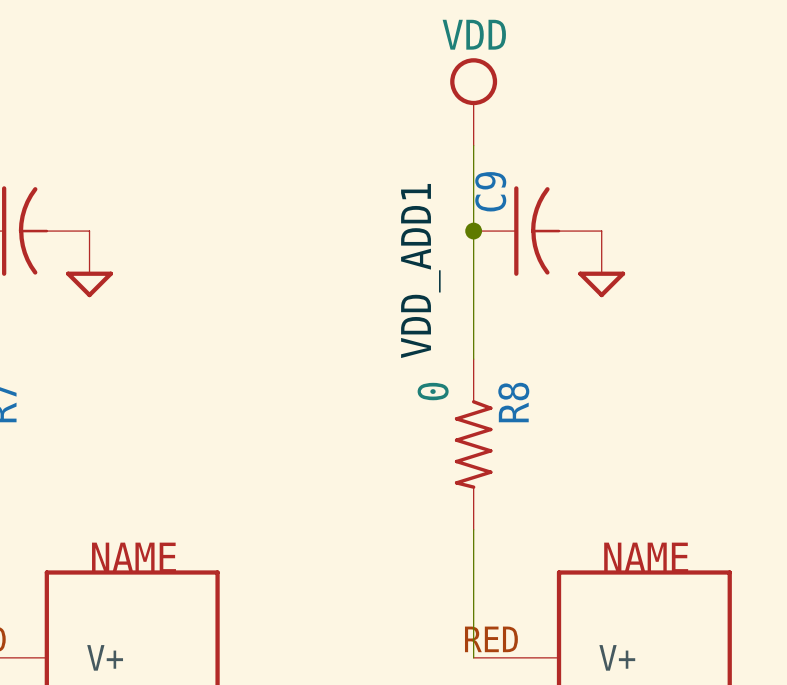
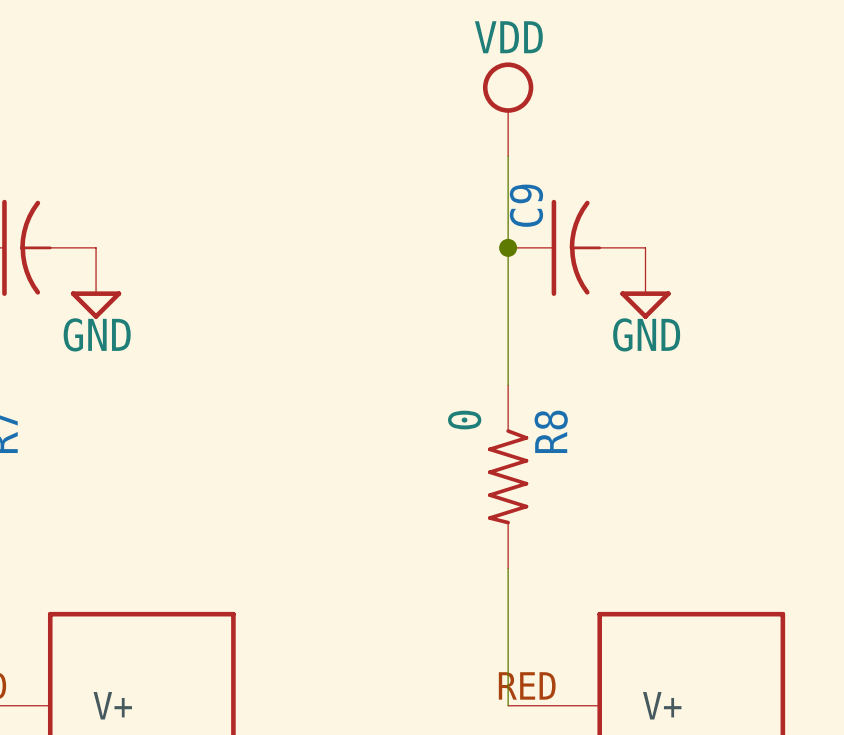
label: VDD_ADD1 (420, 271) -> none
power symbol text: none -> GND (97, 334)
power symbol text: none -> GND (646, 334)
part text: NAME (134, 557) -> none
part text: NAME (646, 557) -> none

